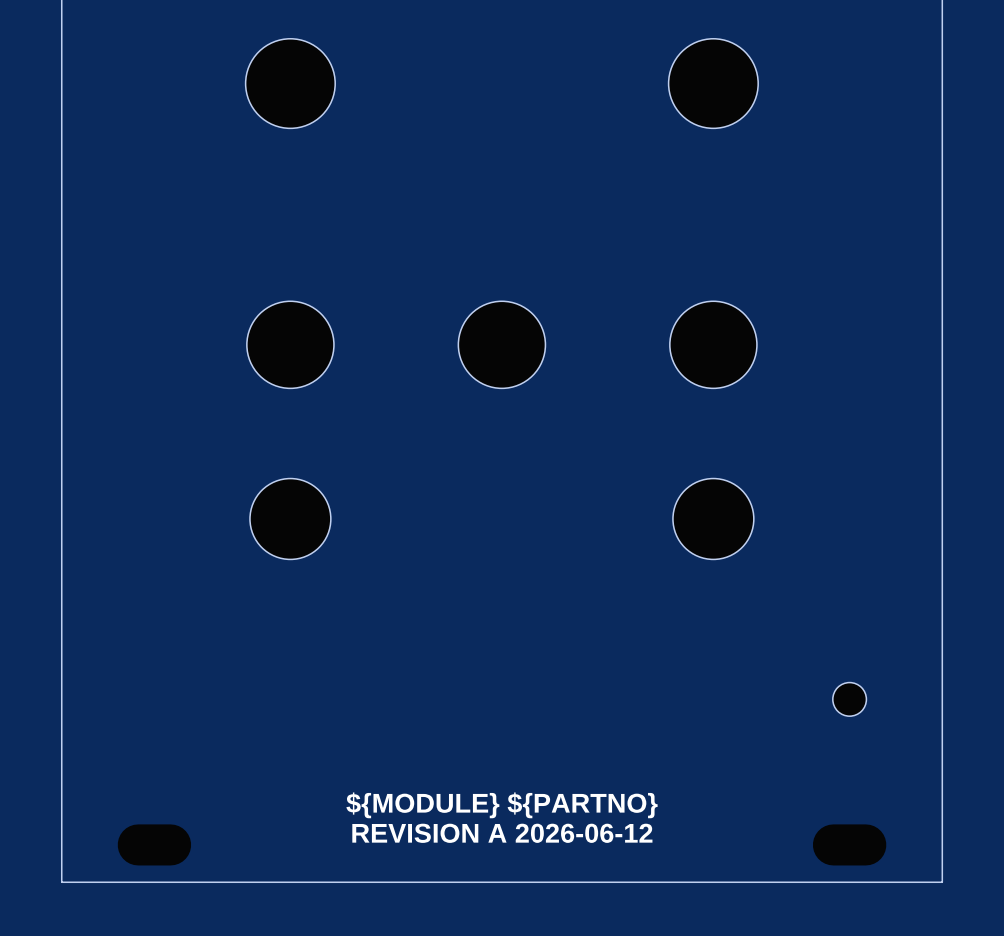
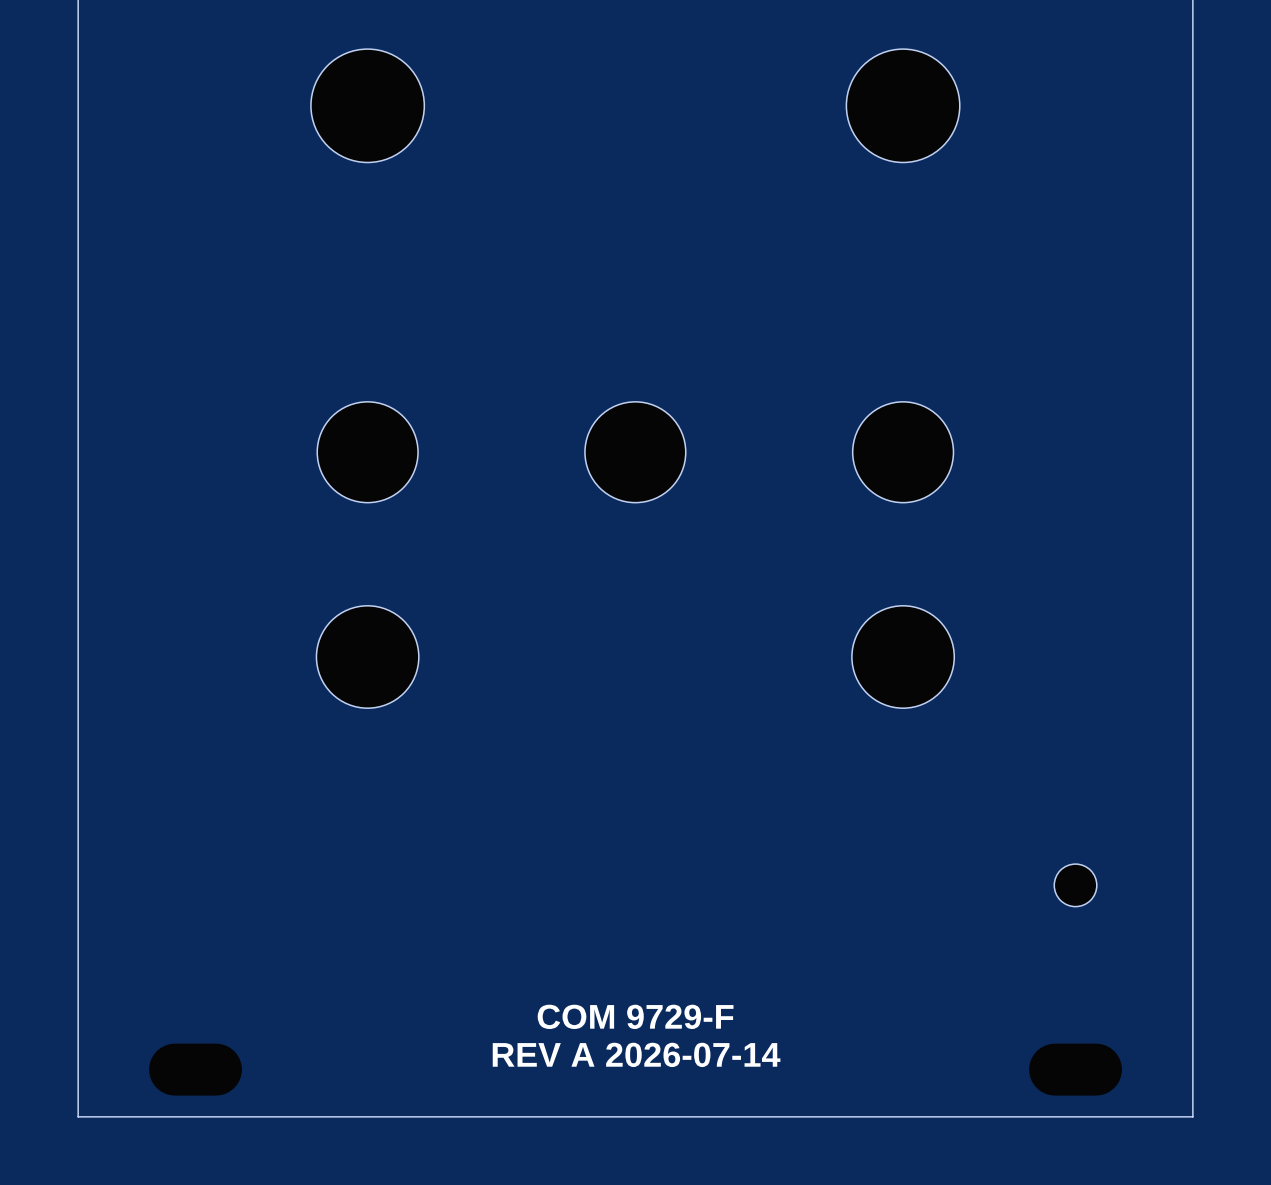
part: (290, 344) -> none
part: (501, 344) -> none
part: (713, 344) -> none
part: none -> (367, 452)
part: none -> (635, 452)
part: none -> (903, 452)
text: ${MODULE} ${PARTNO} (501, 805) -> COM 9729-F (635, 1016)
text: REVISION A 2026-06-12 (502, 833) -> REV A 2026-07-14 (636, 1054)

